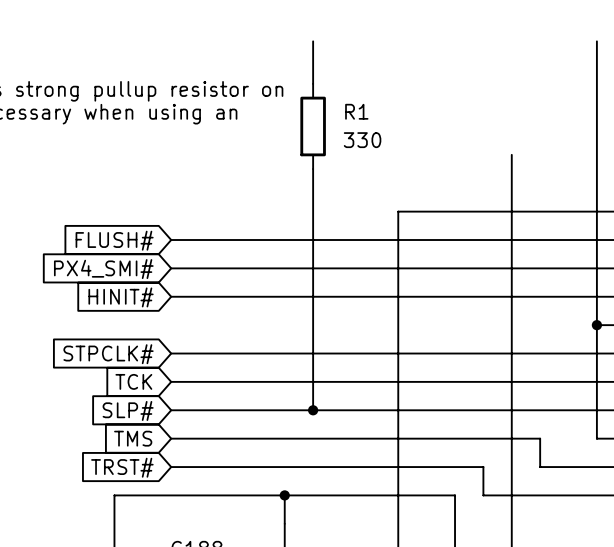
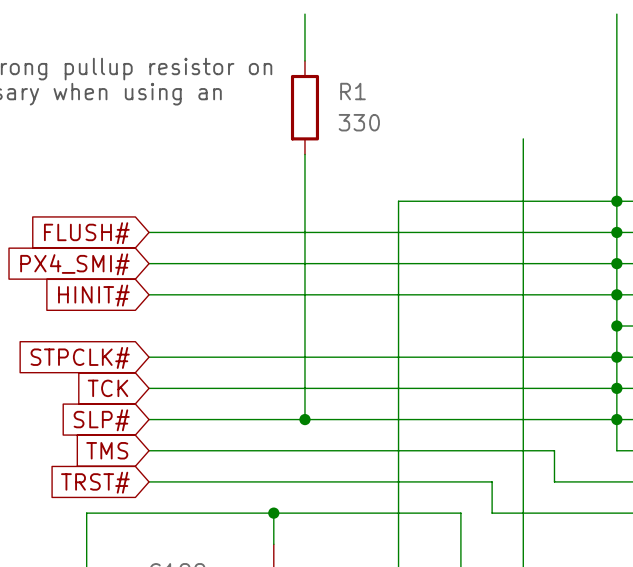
junction: none -> (616, 201)
junction: none -> (616, 232)
junction: none -> (616, 263)
junction: none -> (616, 294)
junction: none -> (616, 357)
junction: none -> (616, 388)
junction: none -> (616, 419)

